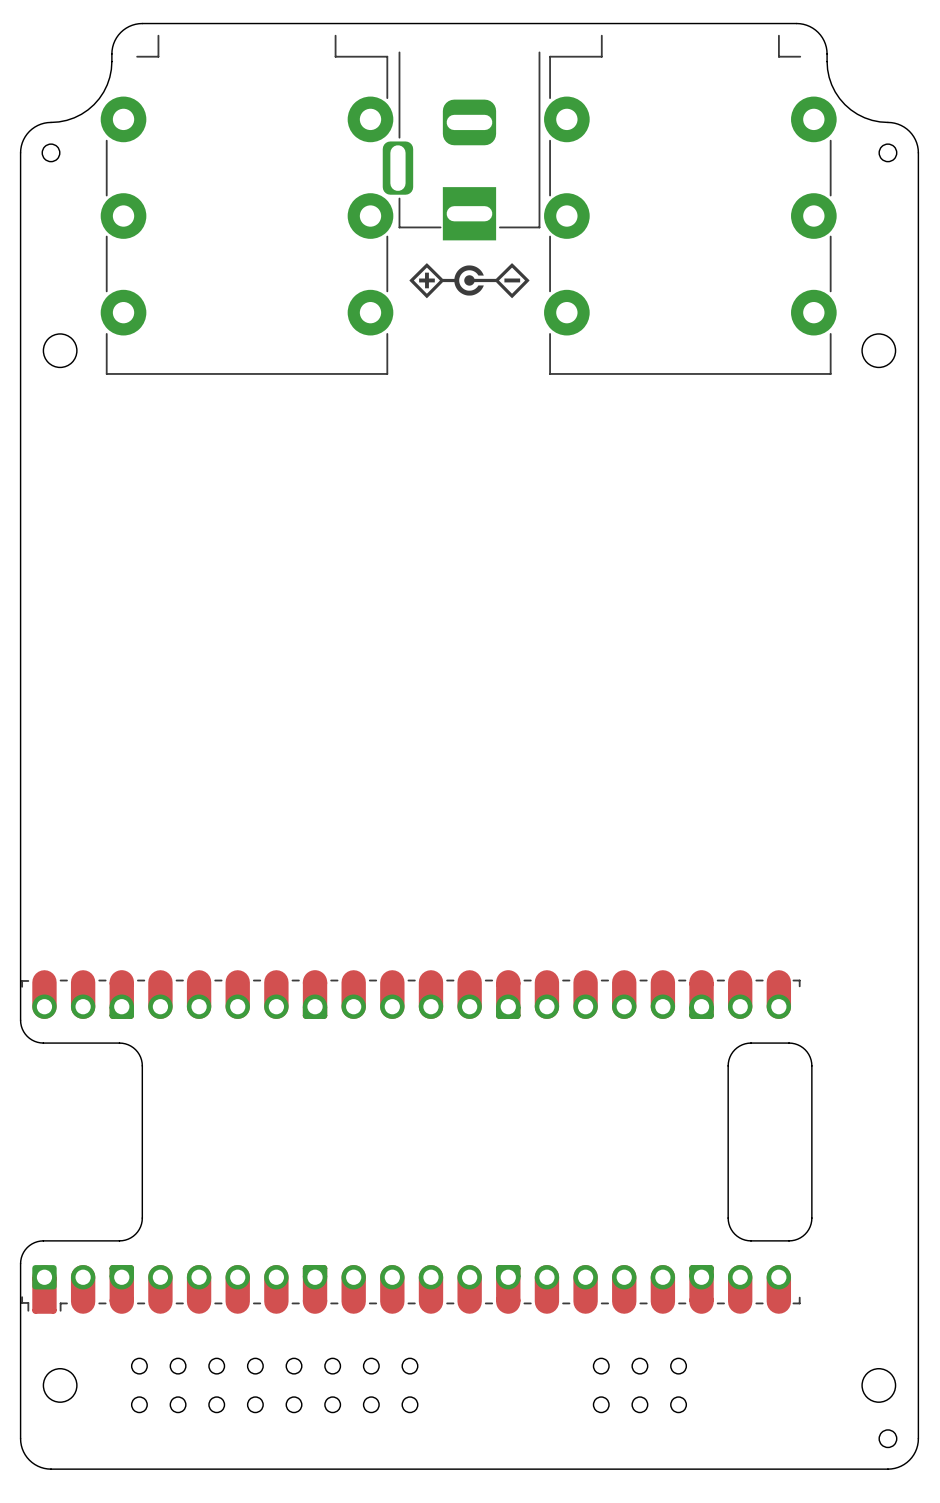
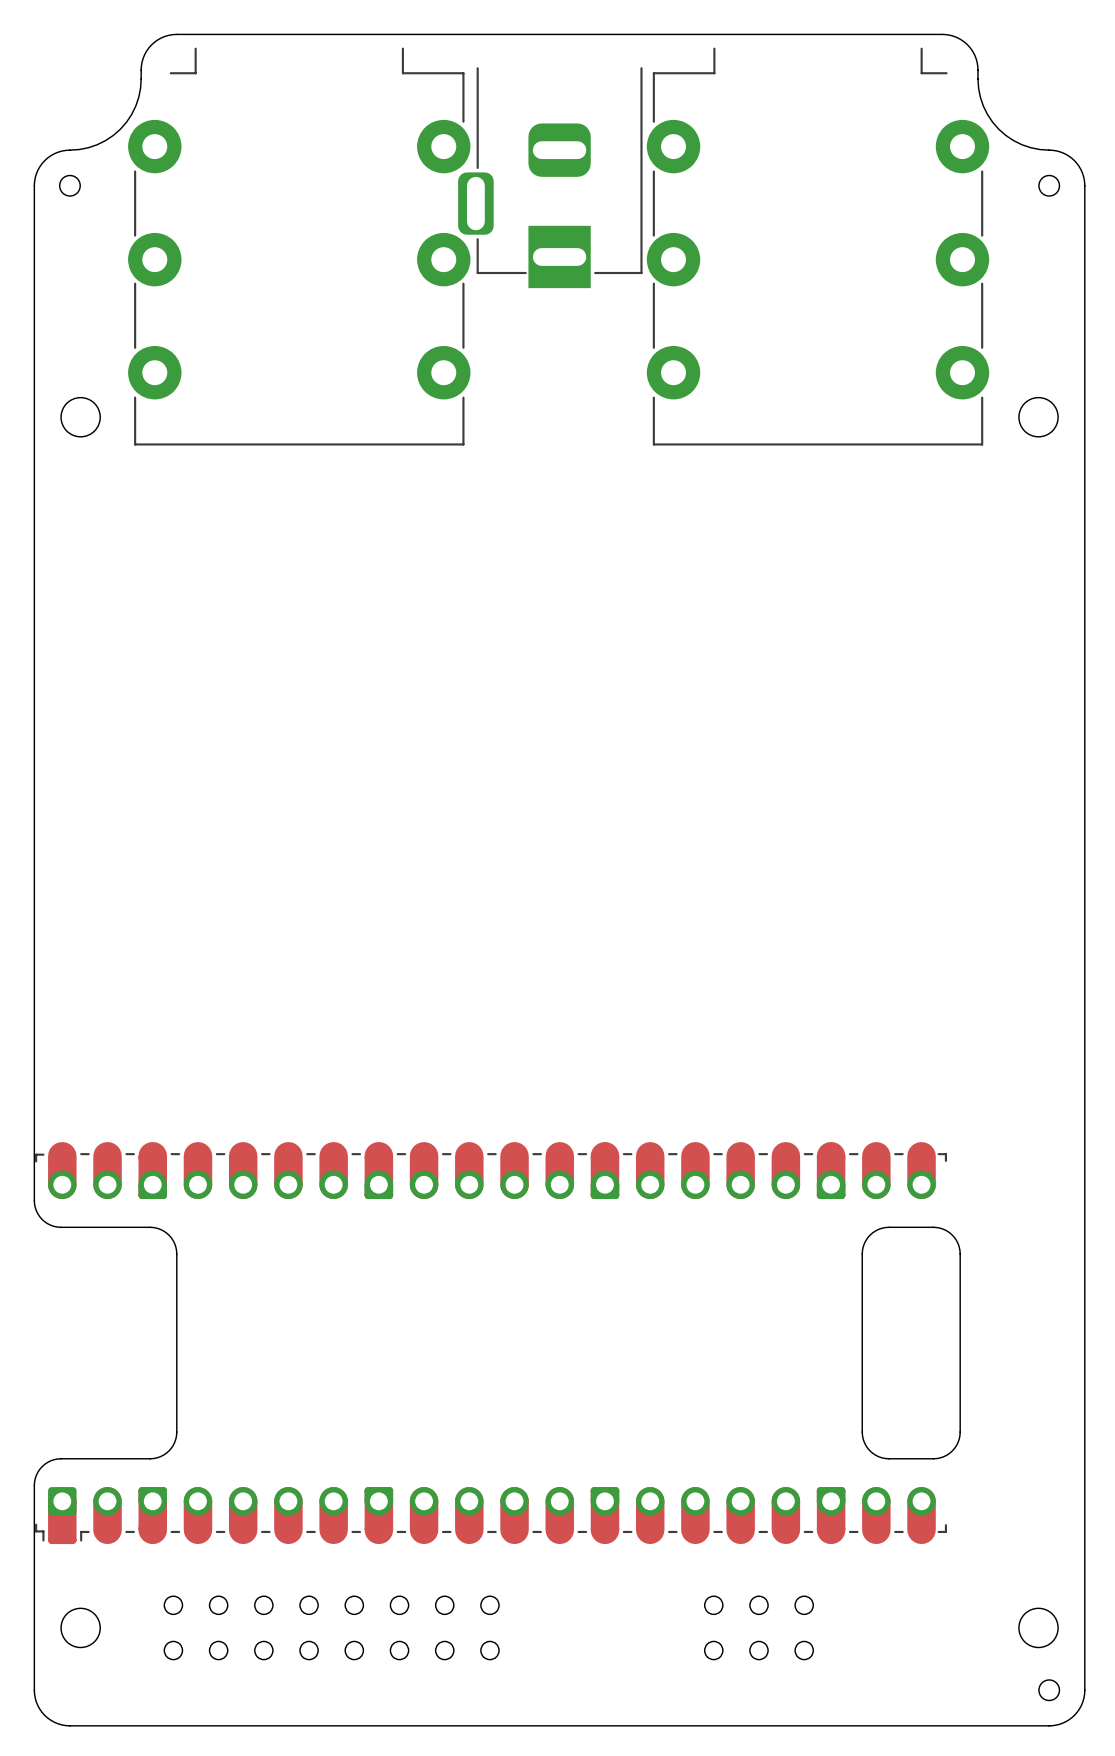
drawing: [409, 263, 530, 299] -> none

